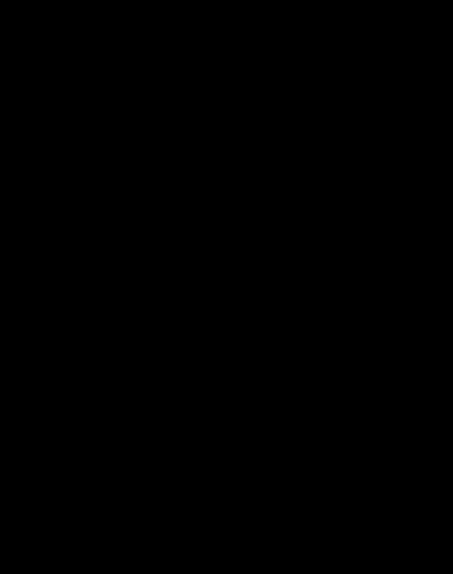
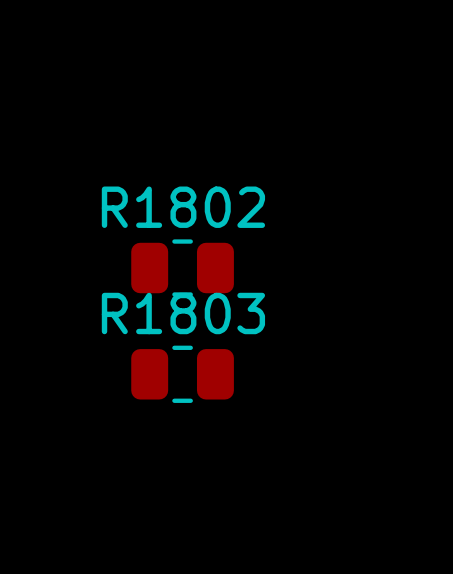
R1802: none -> (182, 268)
R1803: none -> (182, 374)

